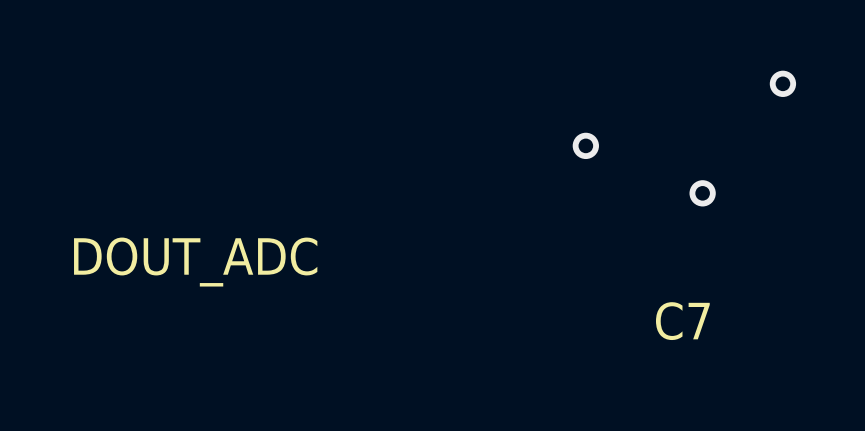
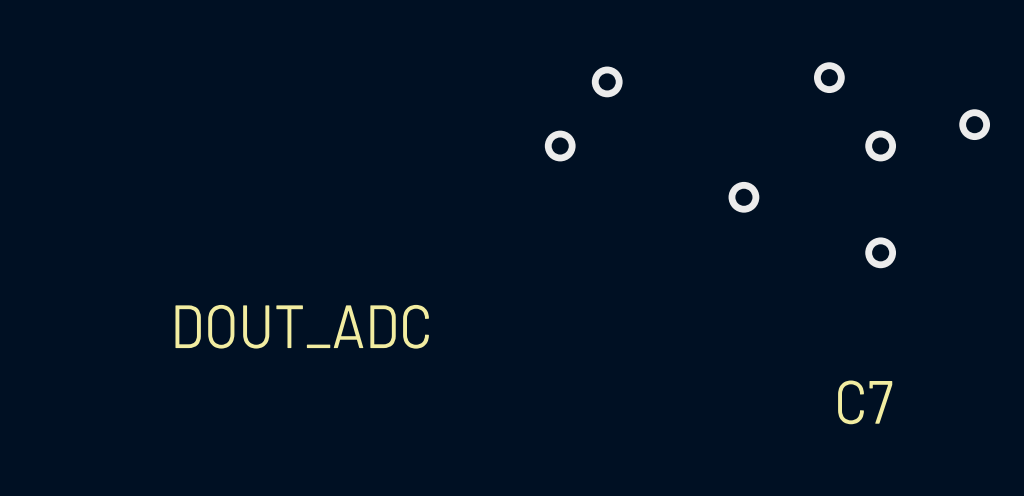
via: none -> (829, 77)
via: none -> (607, 81)
via: none -> (560, 146)
via: none -> (880, 146)

